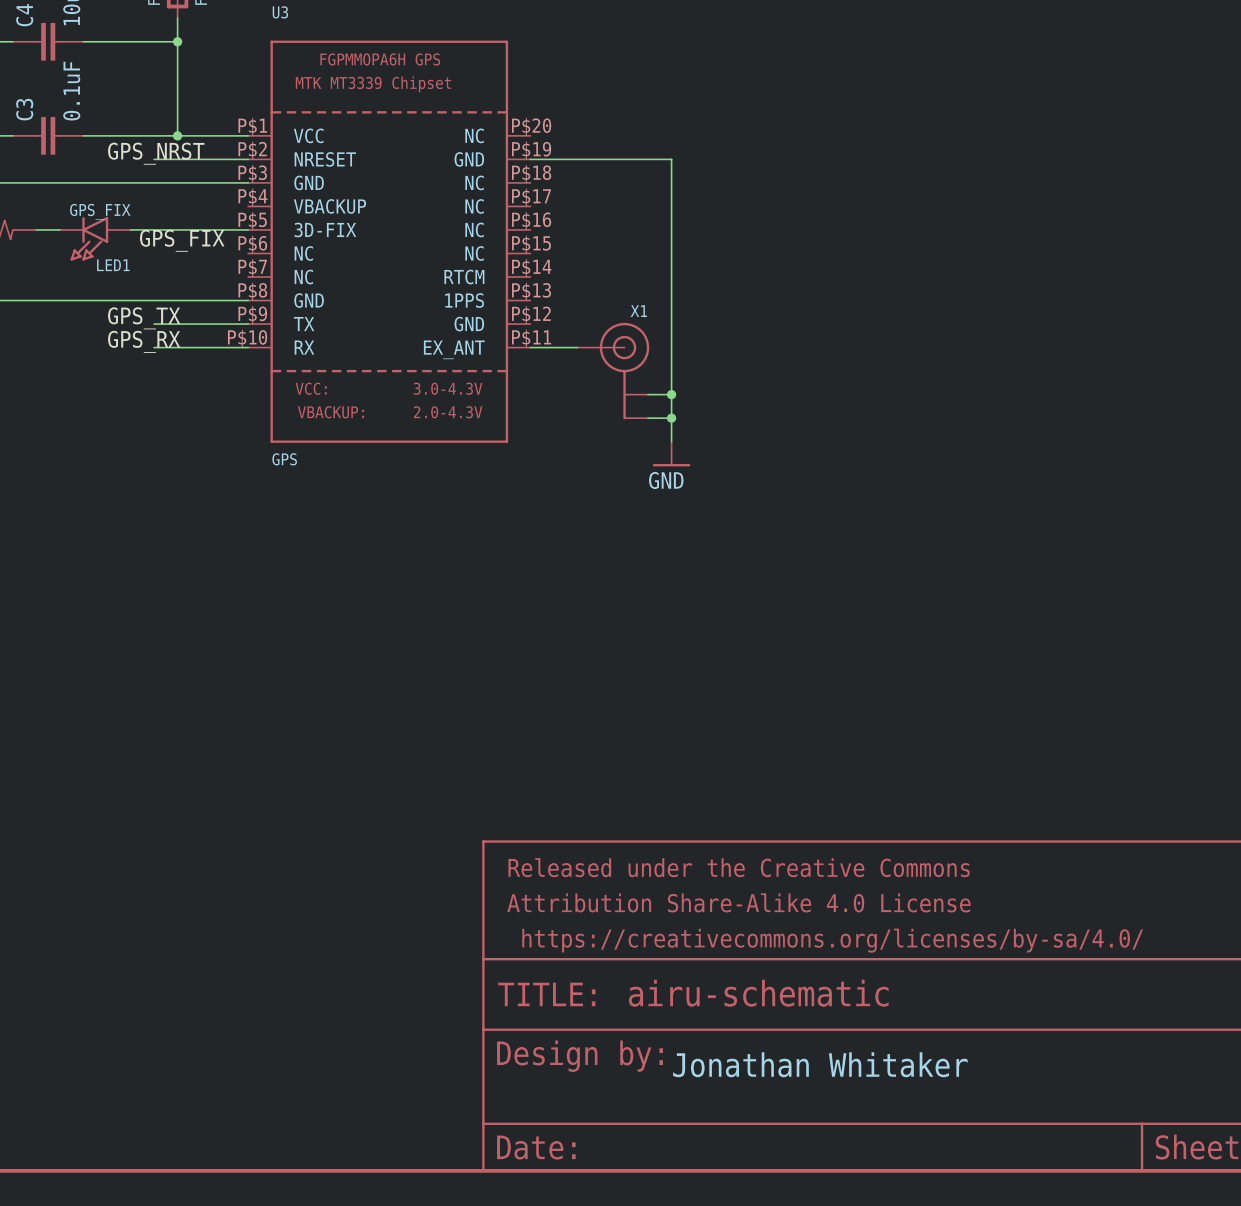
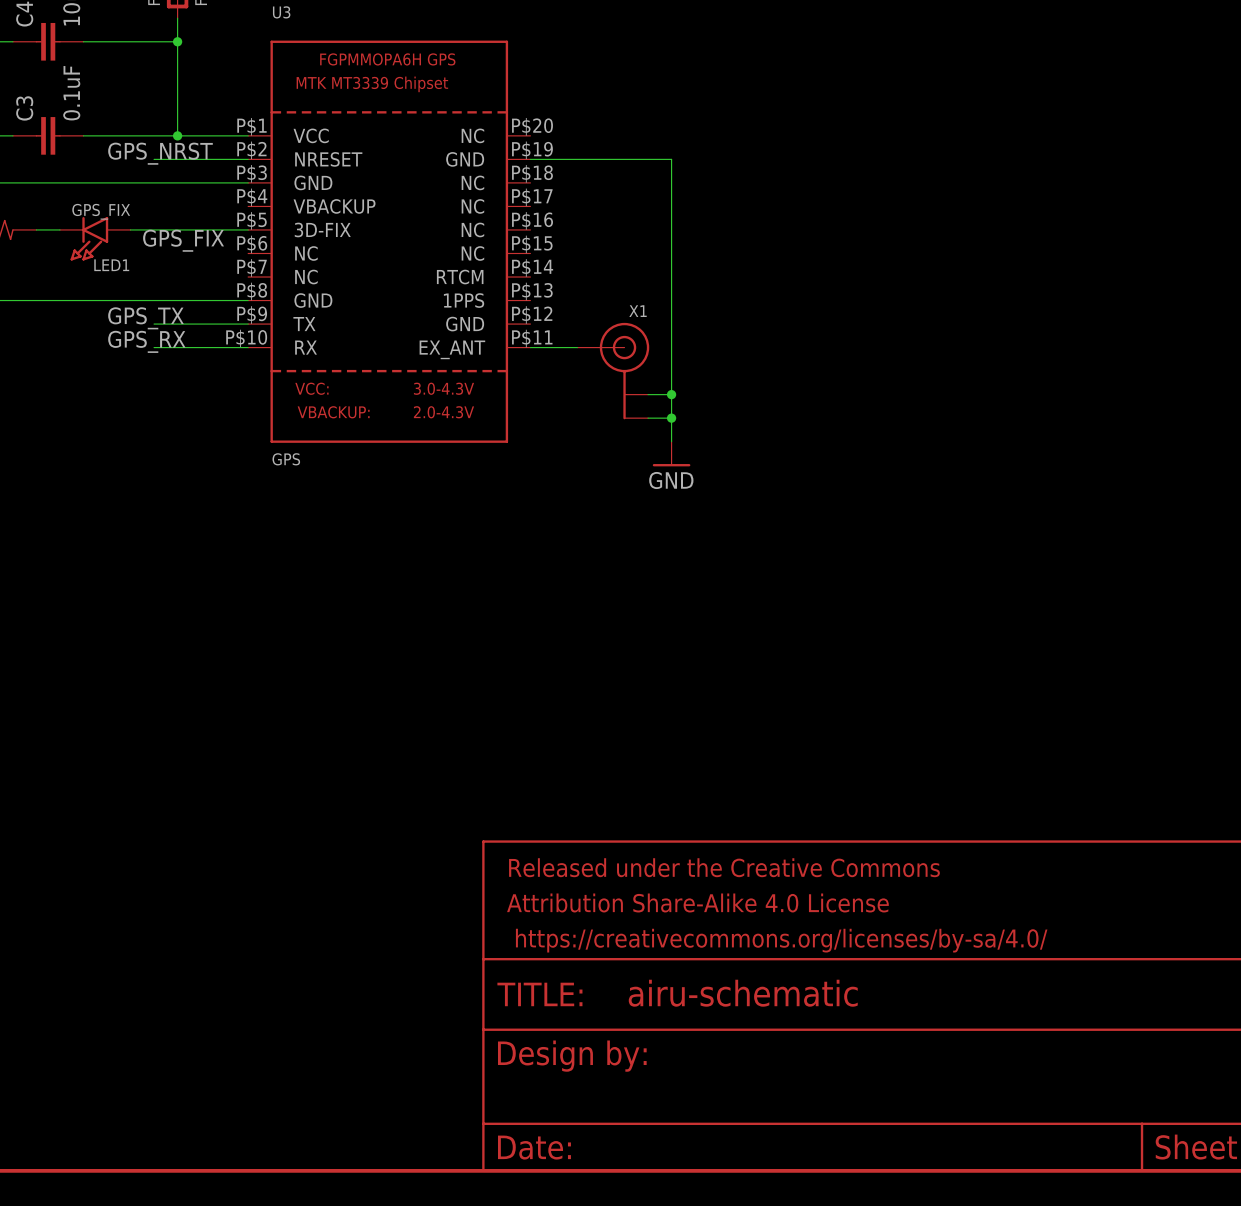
part text: Jonathan Whitaker (820, 1064) -> none

